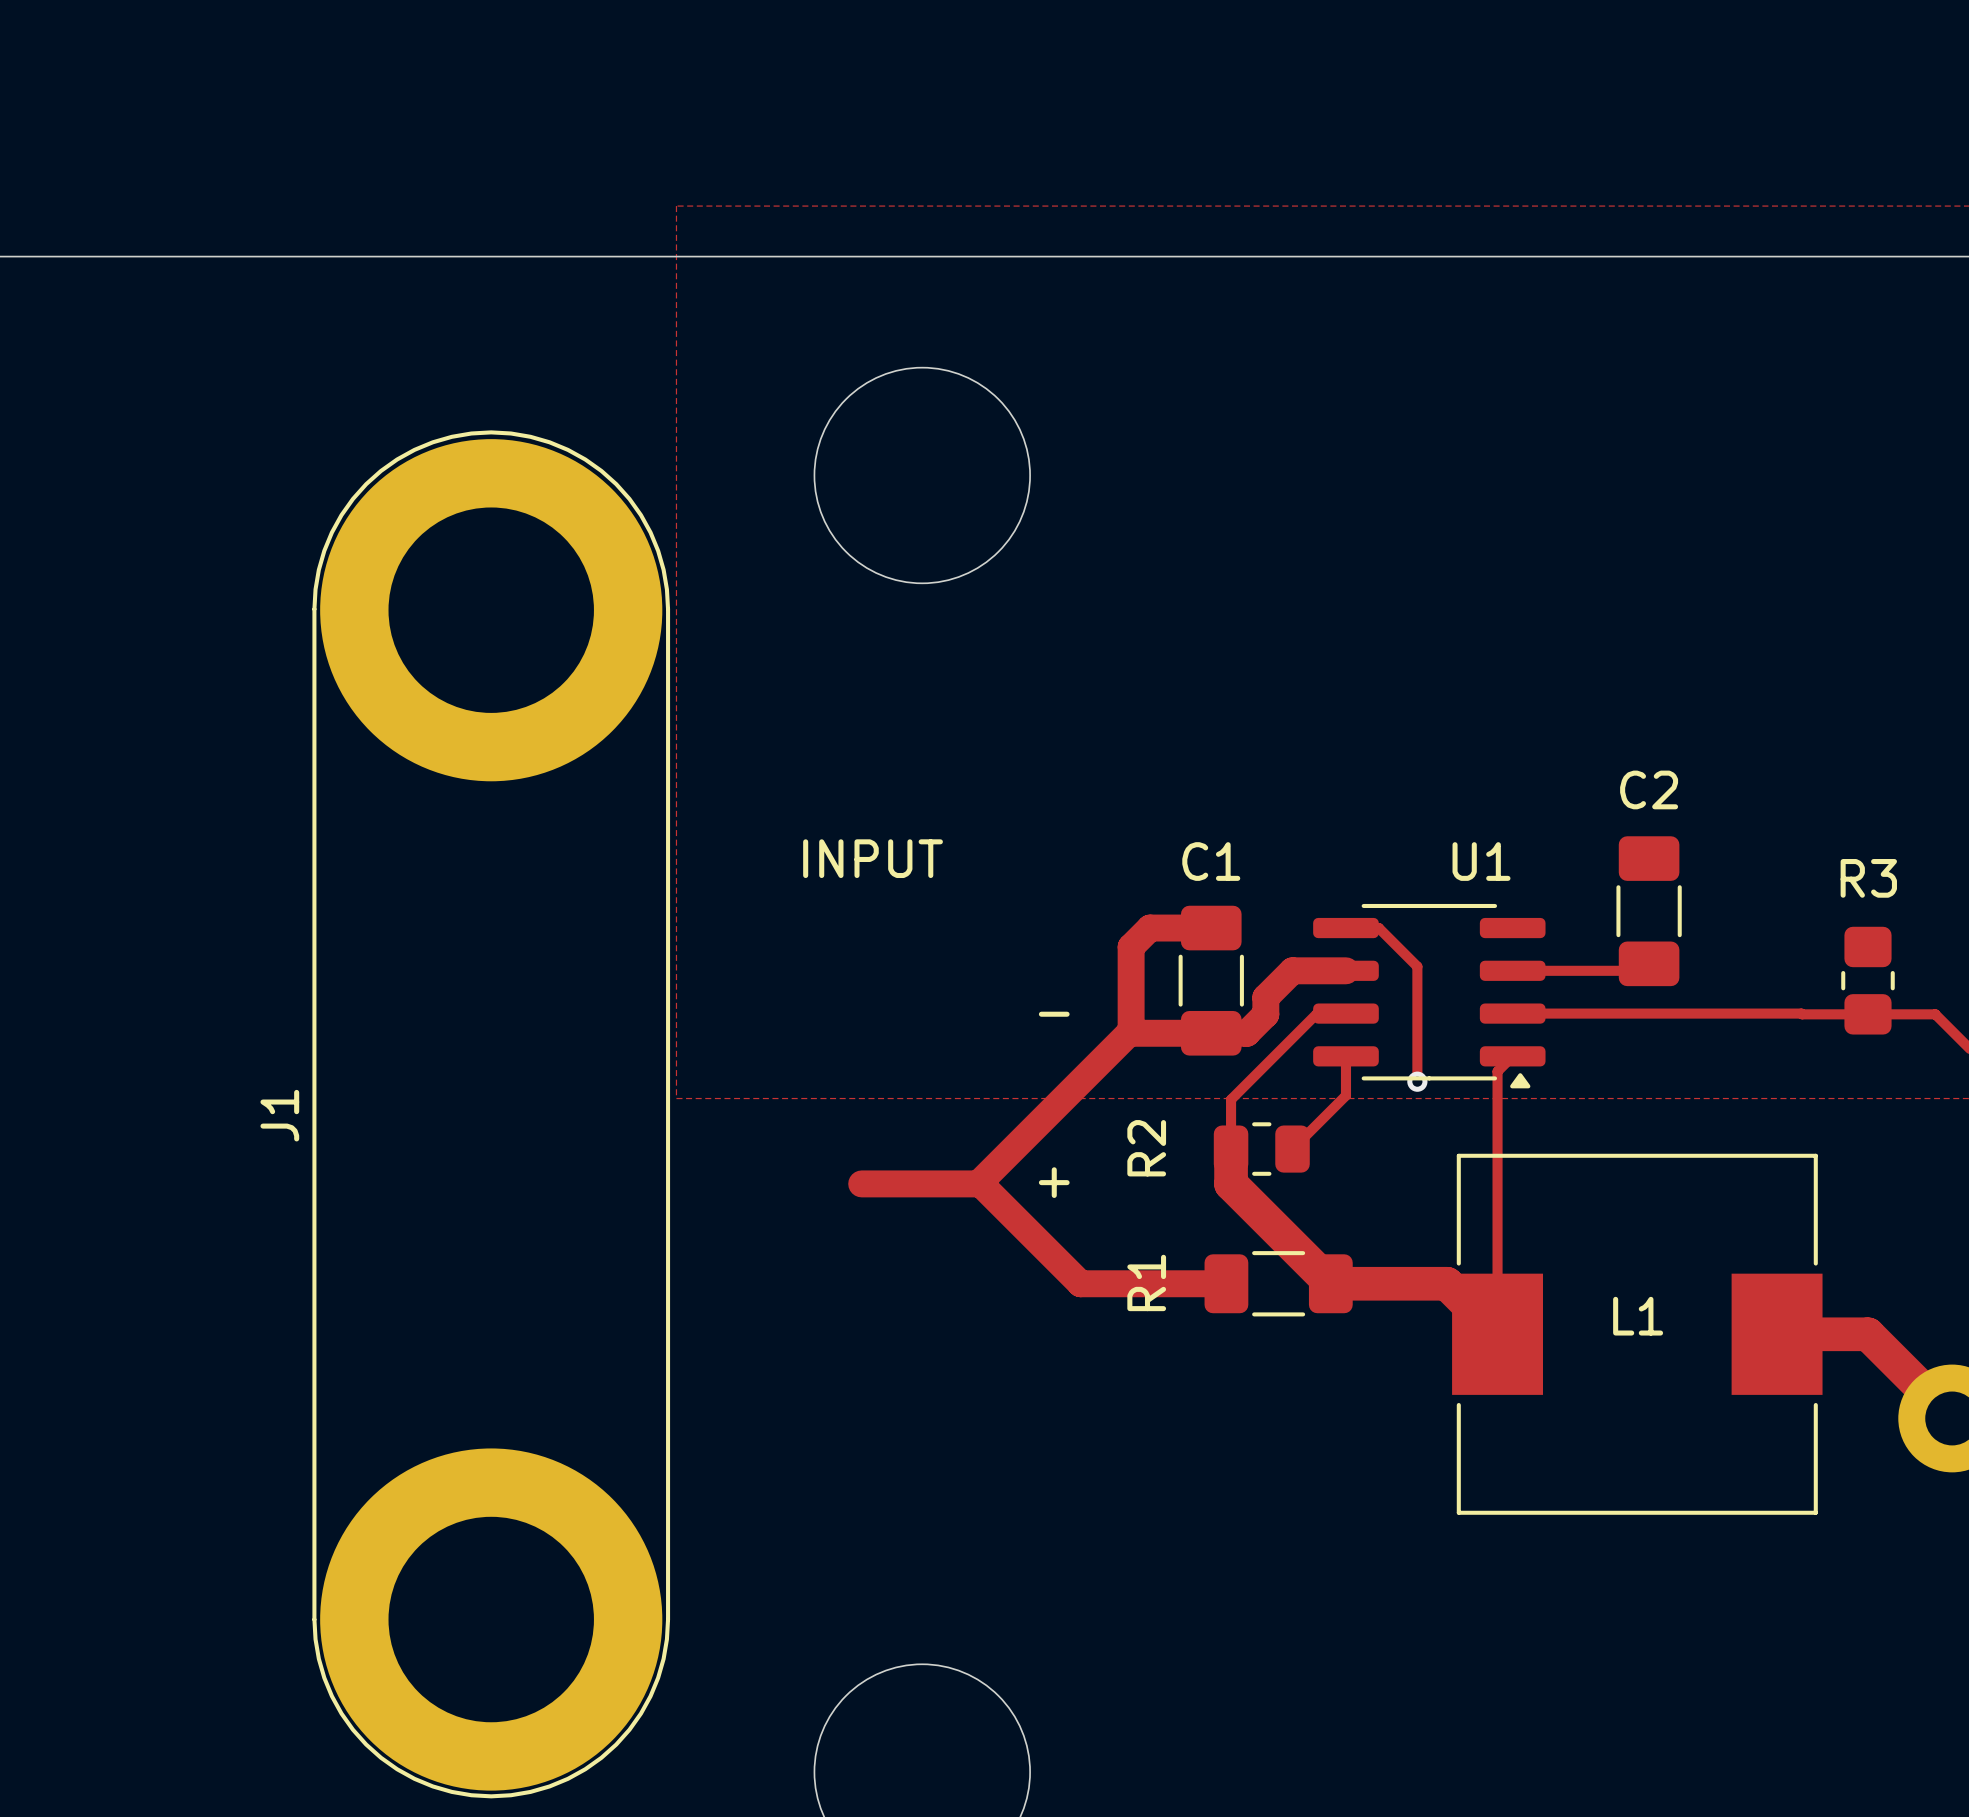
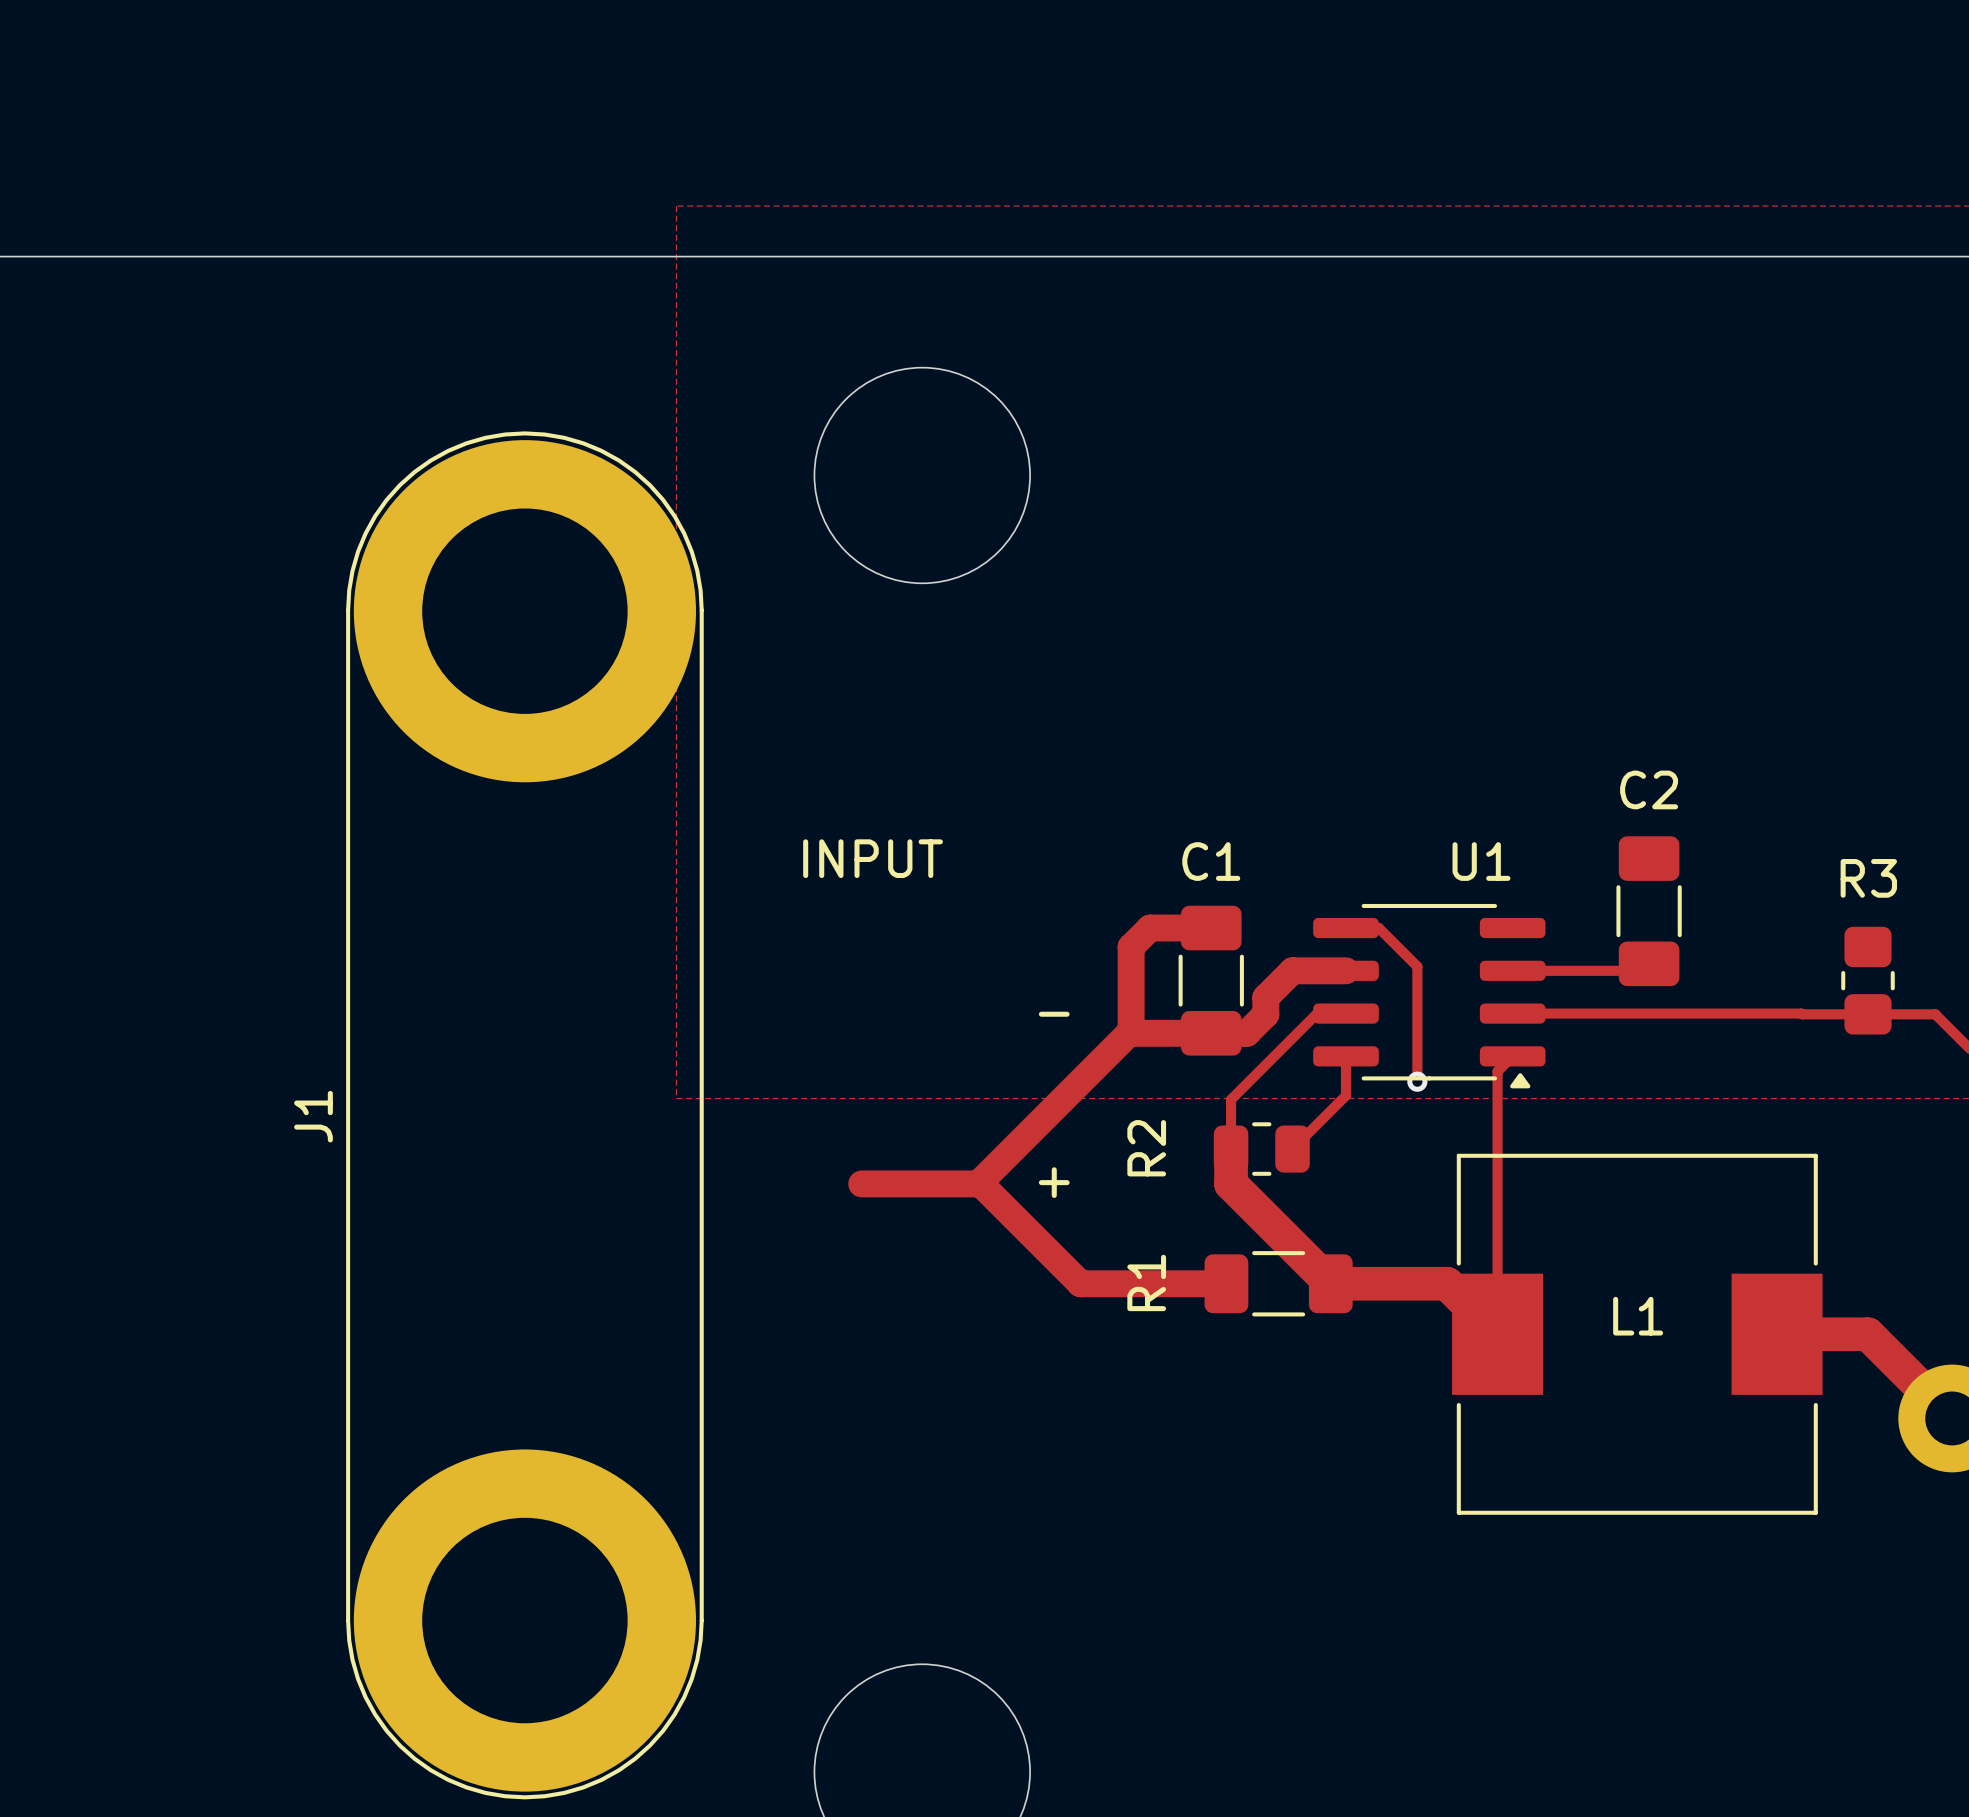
J1 position: (491, 1114) -> (524, 1115)

